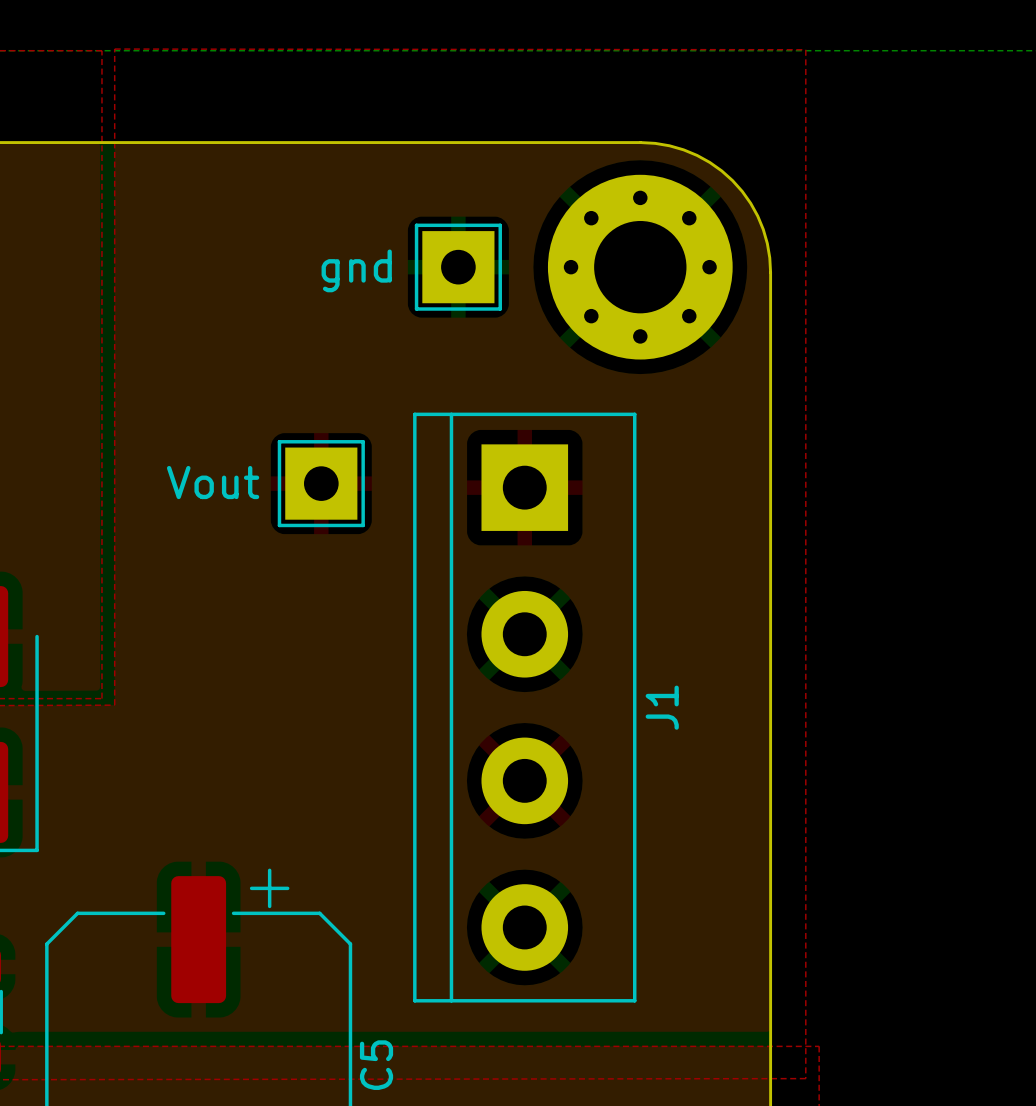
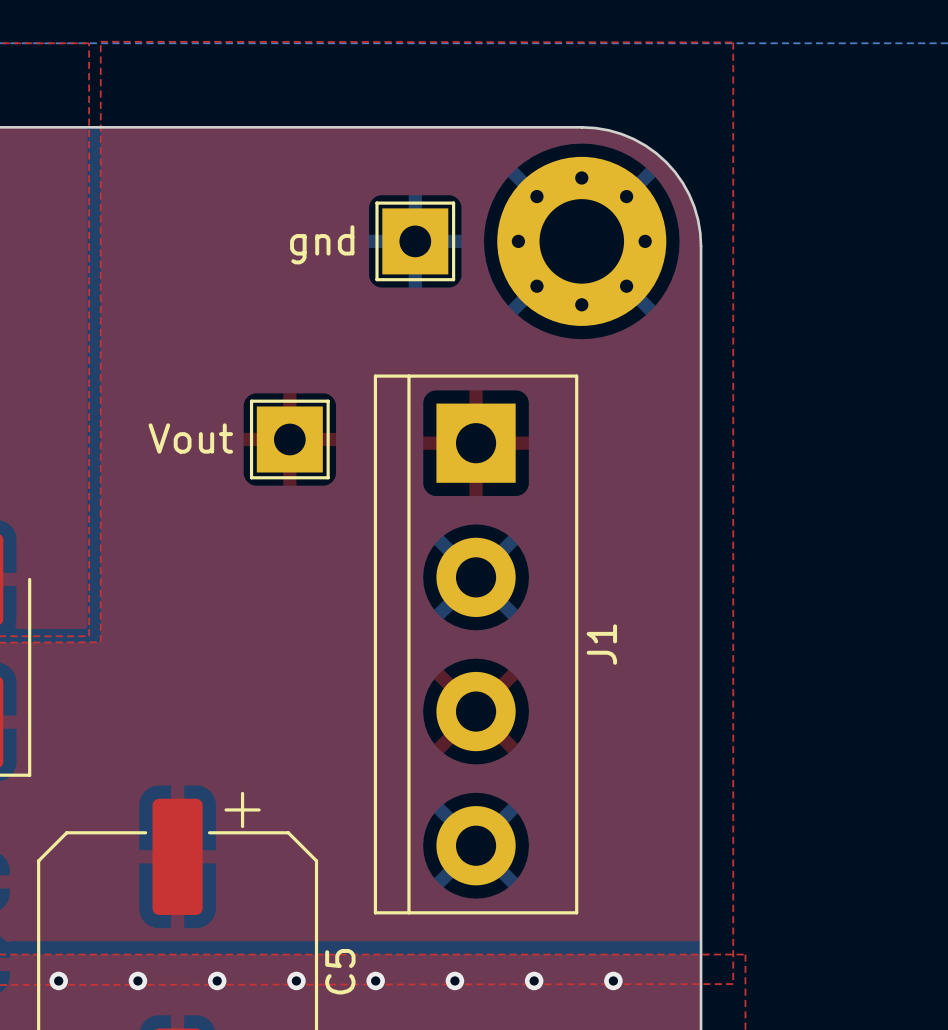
via: none -> (58, 980)
via: none -> (137, 980)
via: none -> (217, 980)
via: none -> (296, 980)
via: none -> (375, 980)
via: none -> (454, 980)
via: none -> (534, 980)
via: none -> (613, 980)

